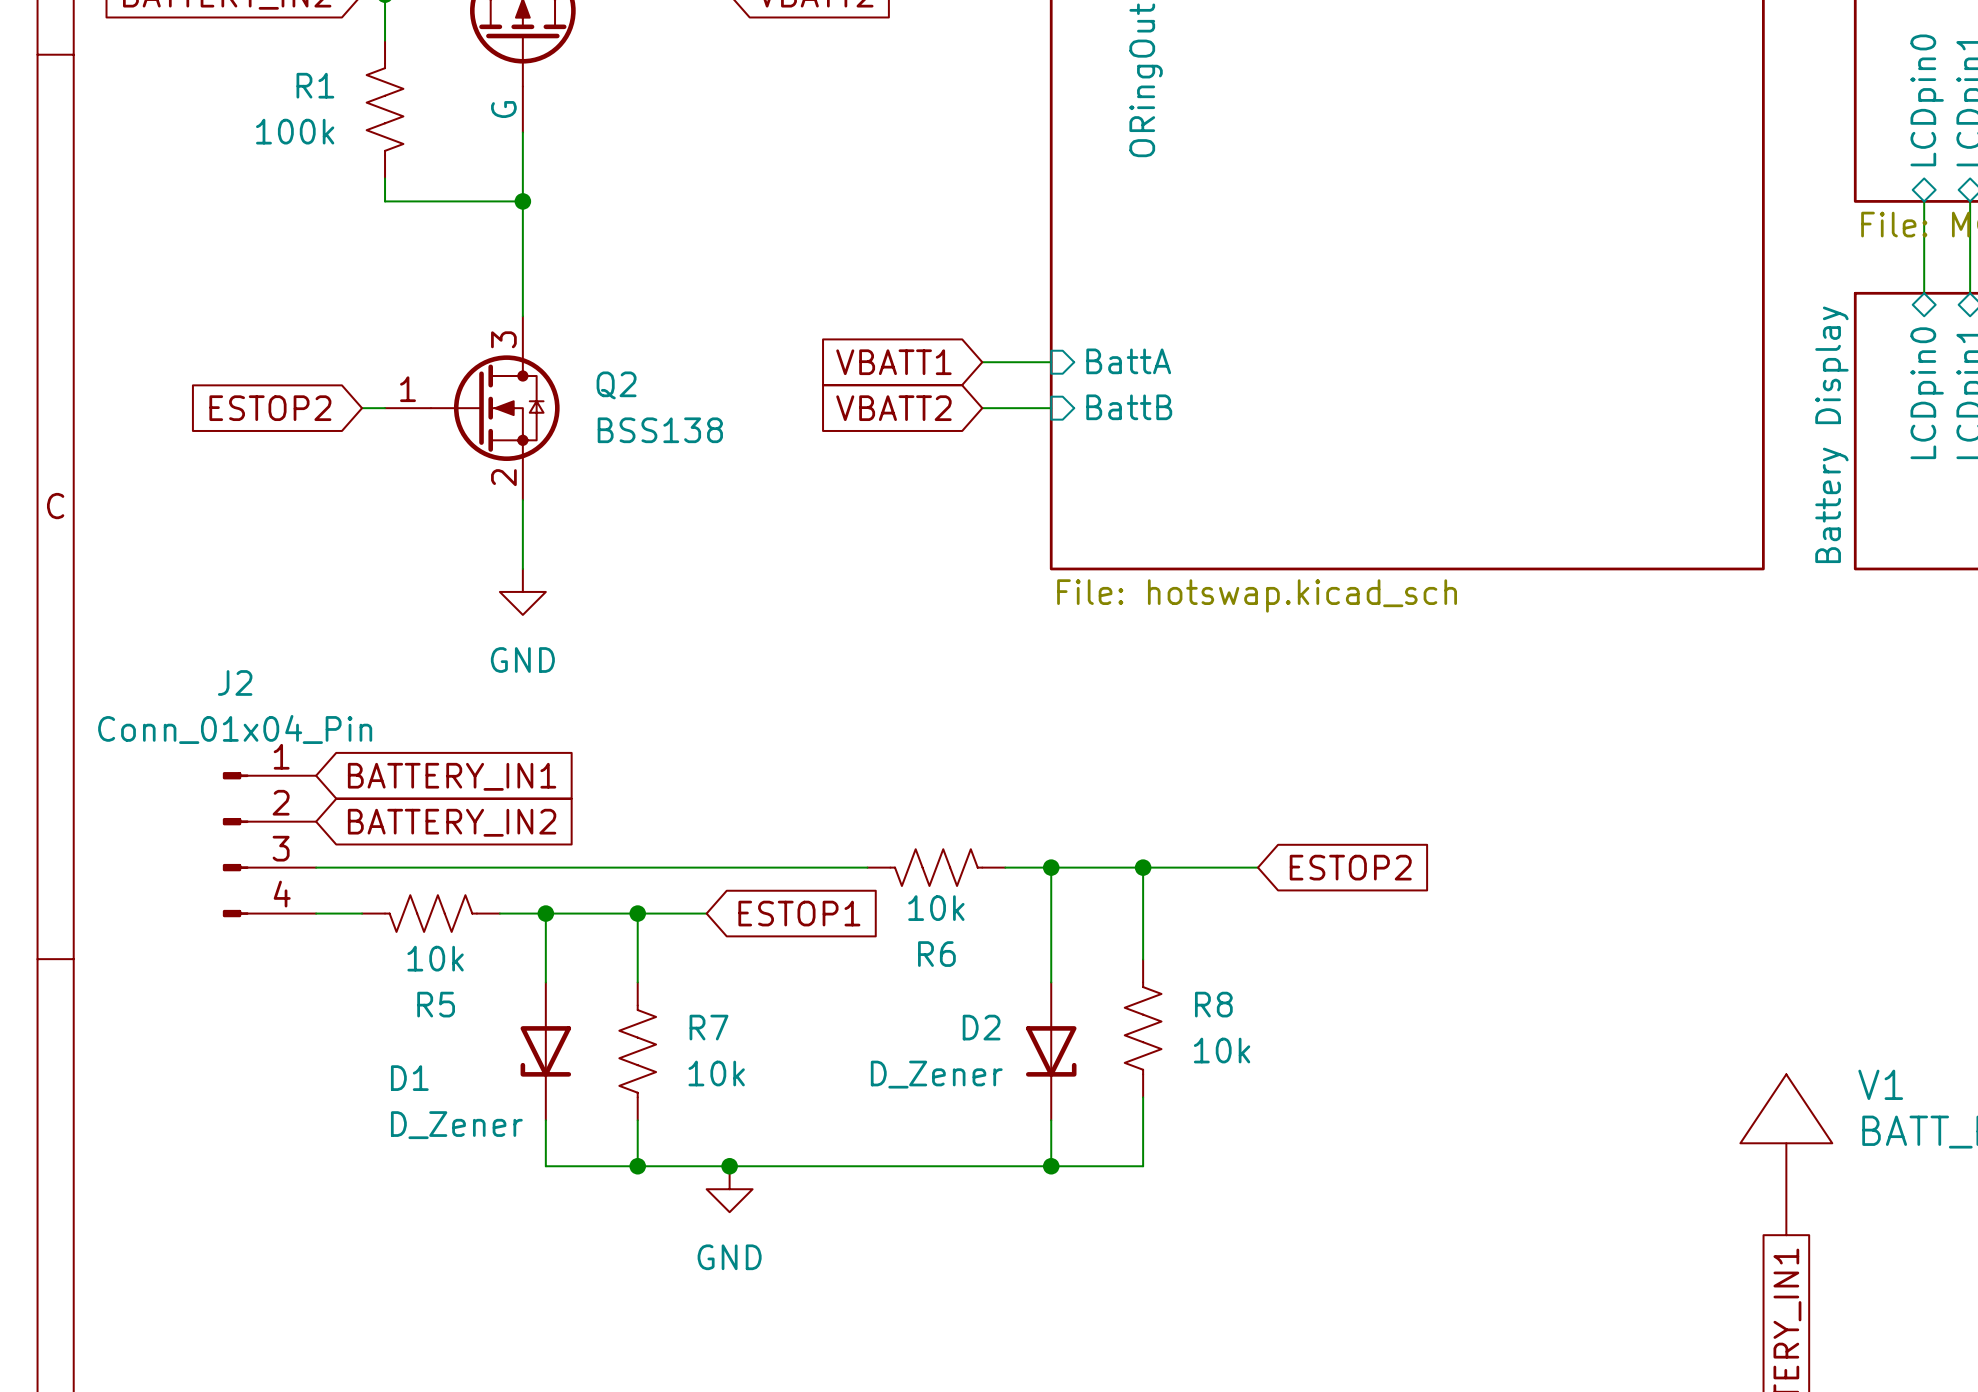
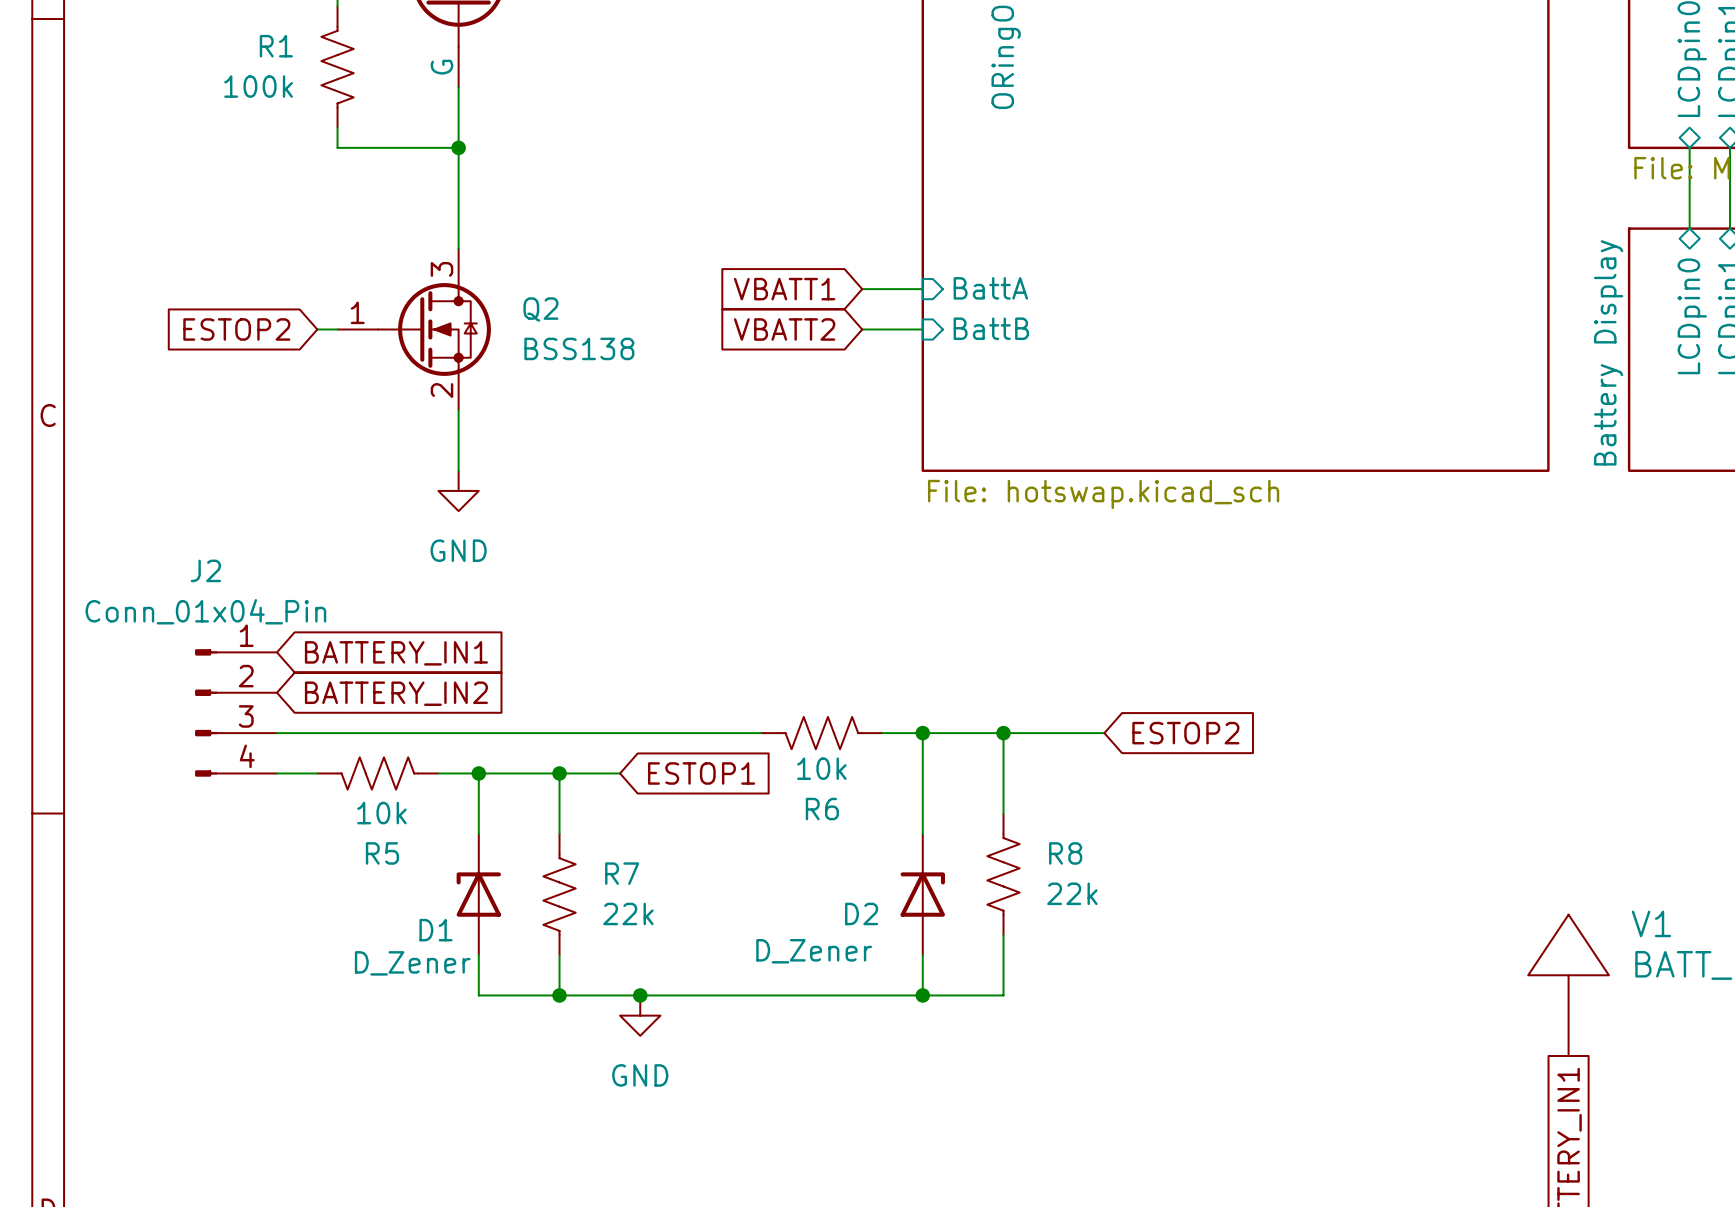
R8 value: 10k (1222, 1050) -> 22k (1072, 893)
D1 flip: as is (545, 1051) -> up-down (478, 894)
D2 flip: as is (1051, 1051) -> up-down (922, 894)
R7 value: 10k (716, 1073) -> 22k (628, 913)
D2 value position: D_Zener (936, 1074) -> D_Zener (814, 951)
D1 name position: D1 (409, 1078) -> D1 (436, 930)

